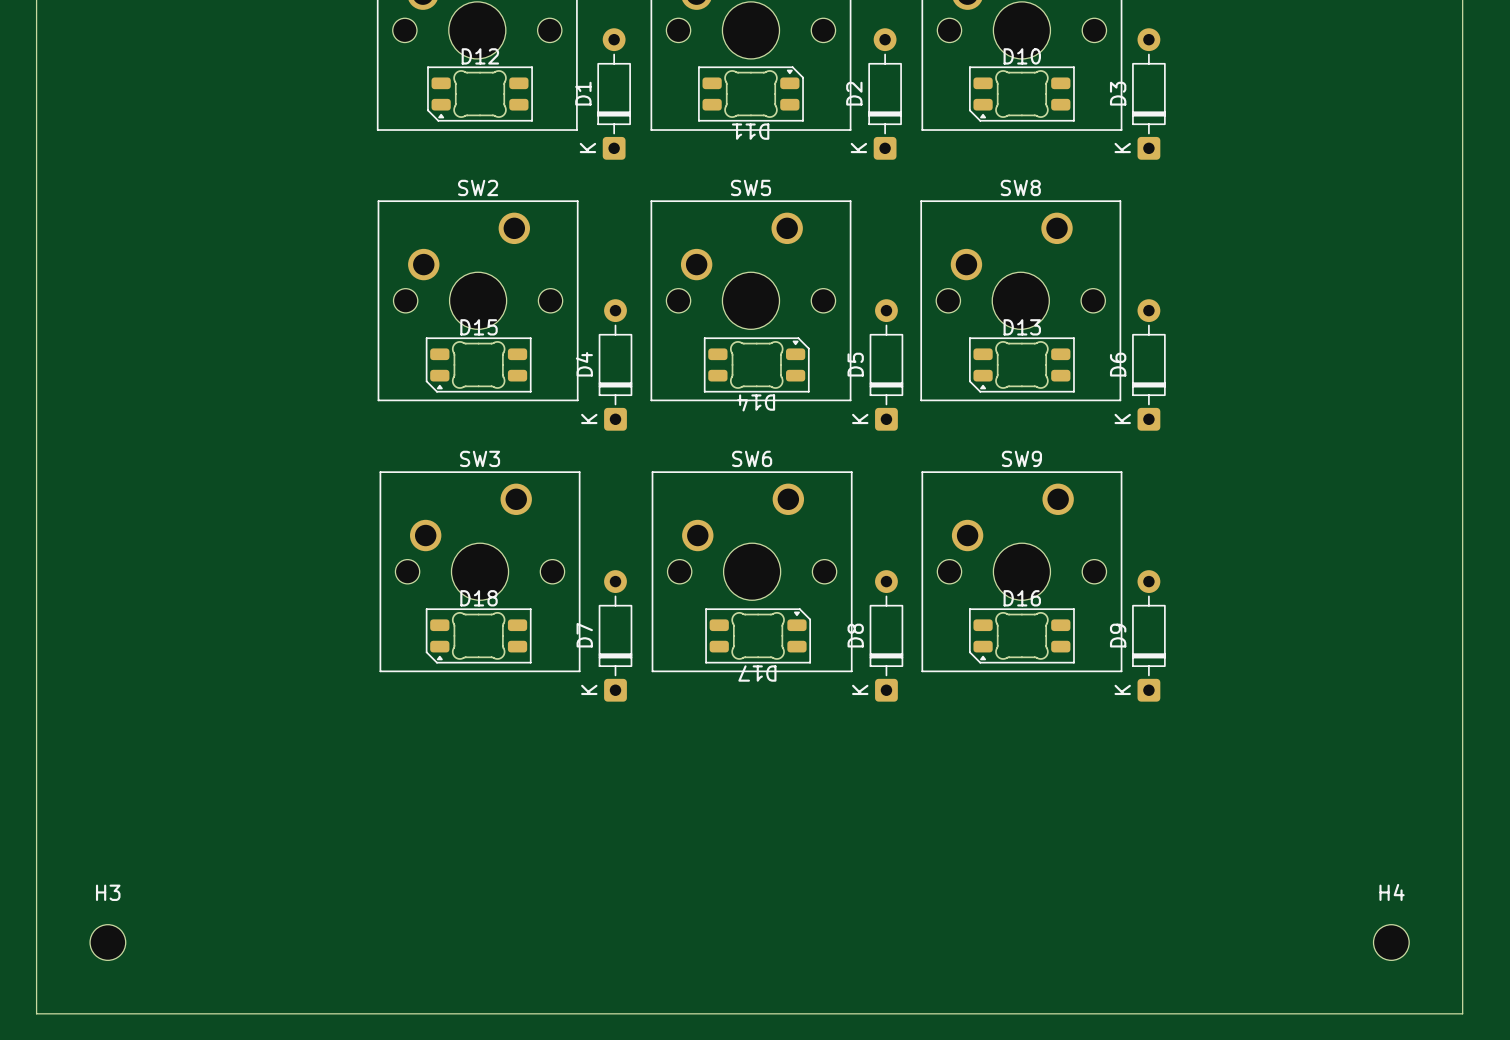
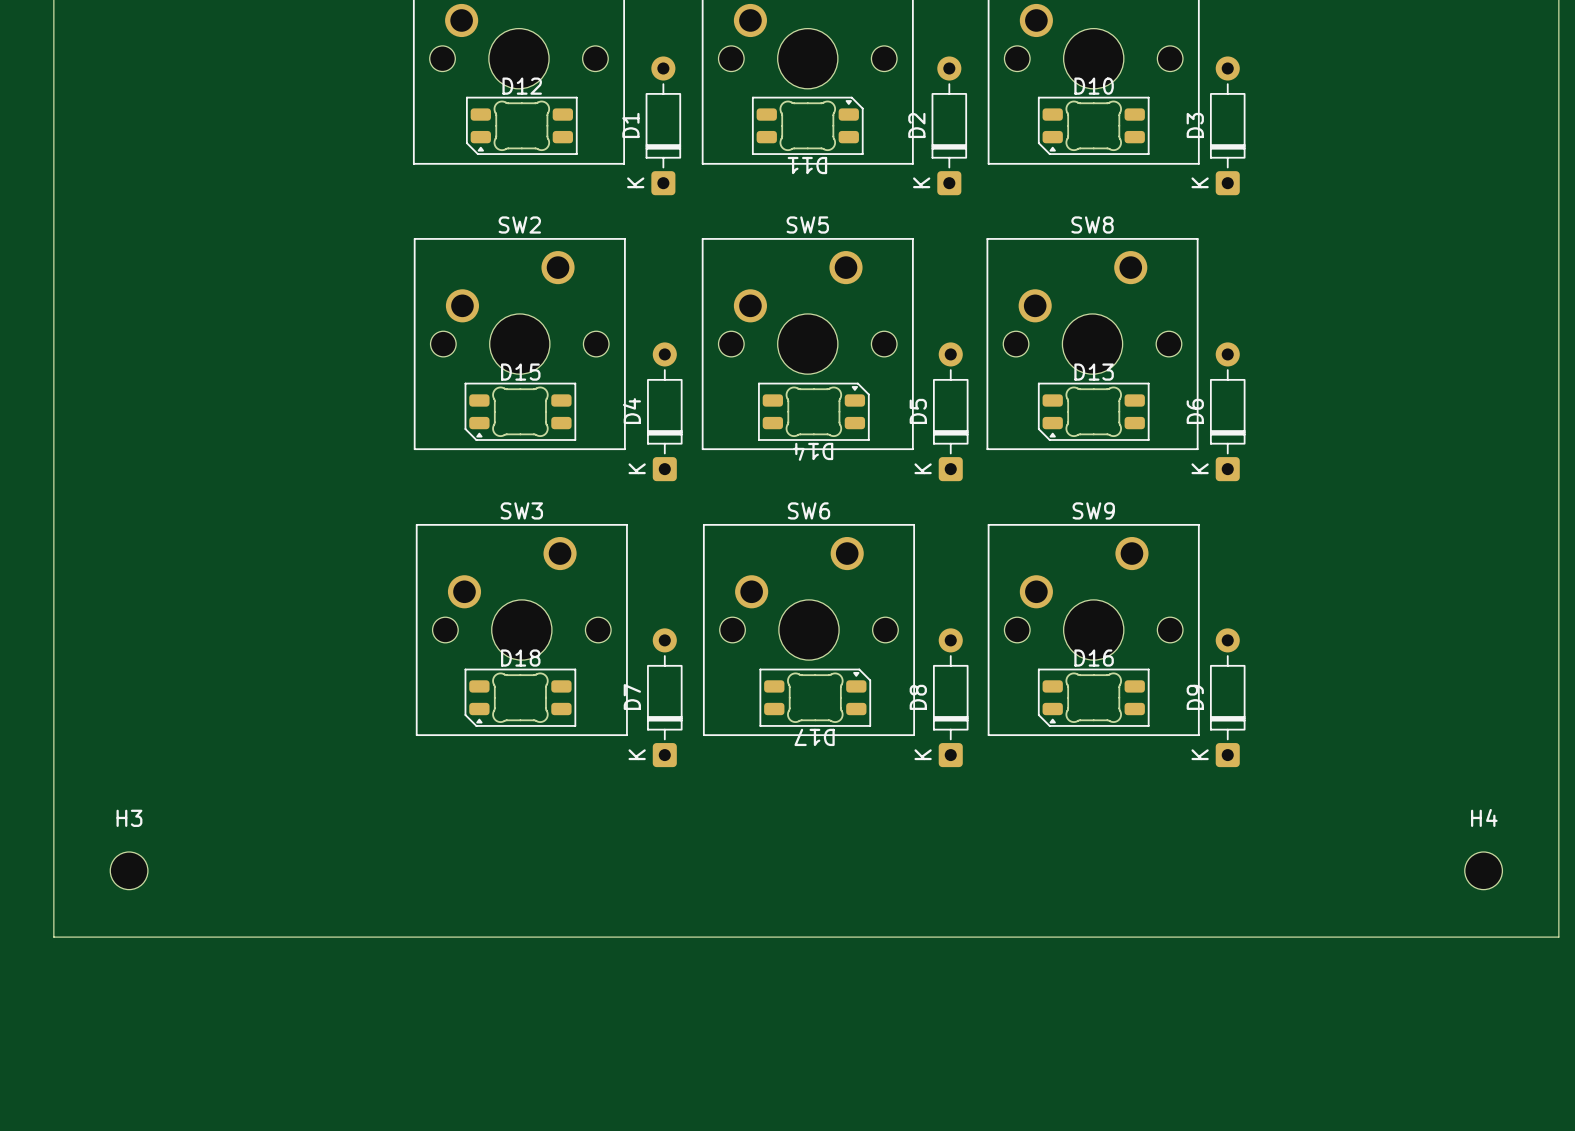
board edge: (36, 862) (36, 1013) (1462, 1013) (1462, 862) -> (53, 937) (1558, 937)
H3 position: (107, 942) -> (129, 870)
H4 position: (1391, 942) -> (1483, 870)

